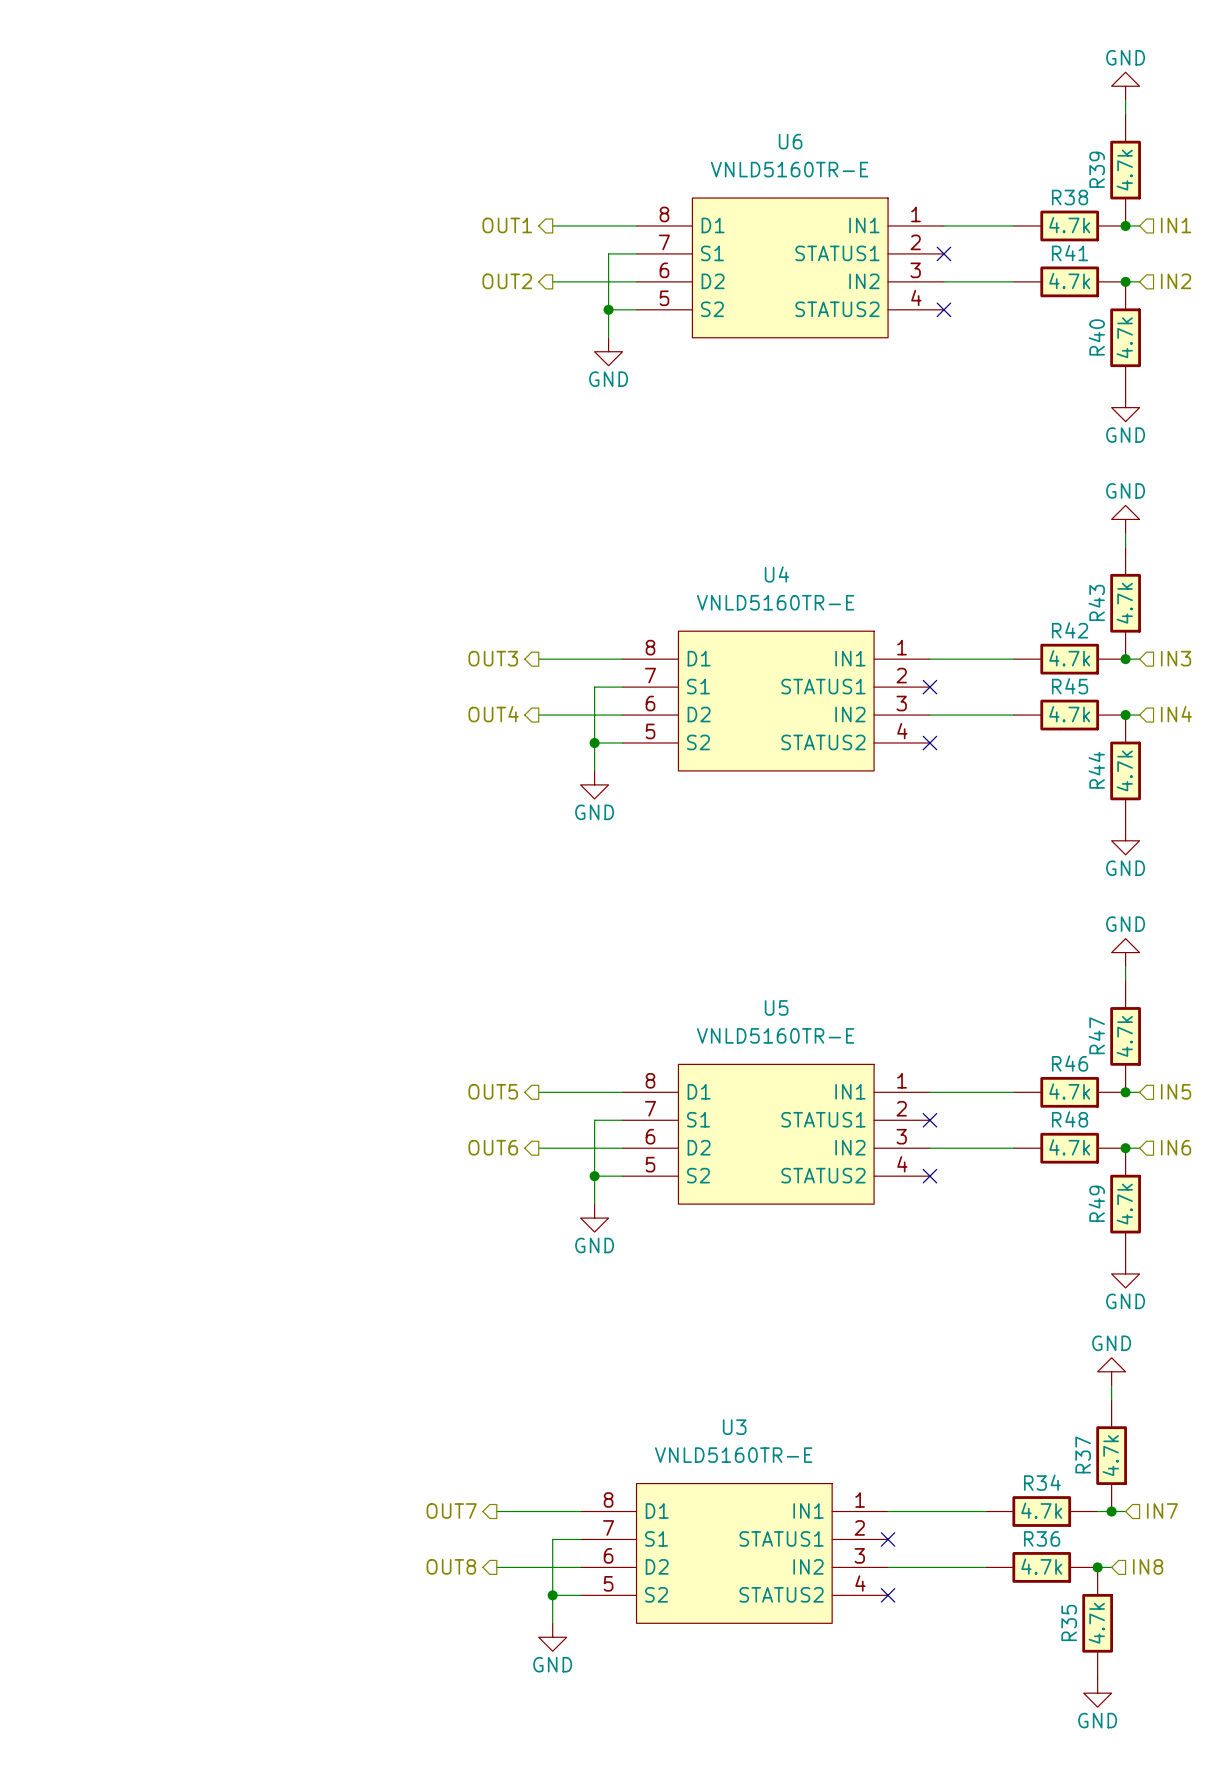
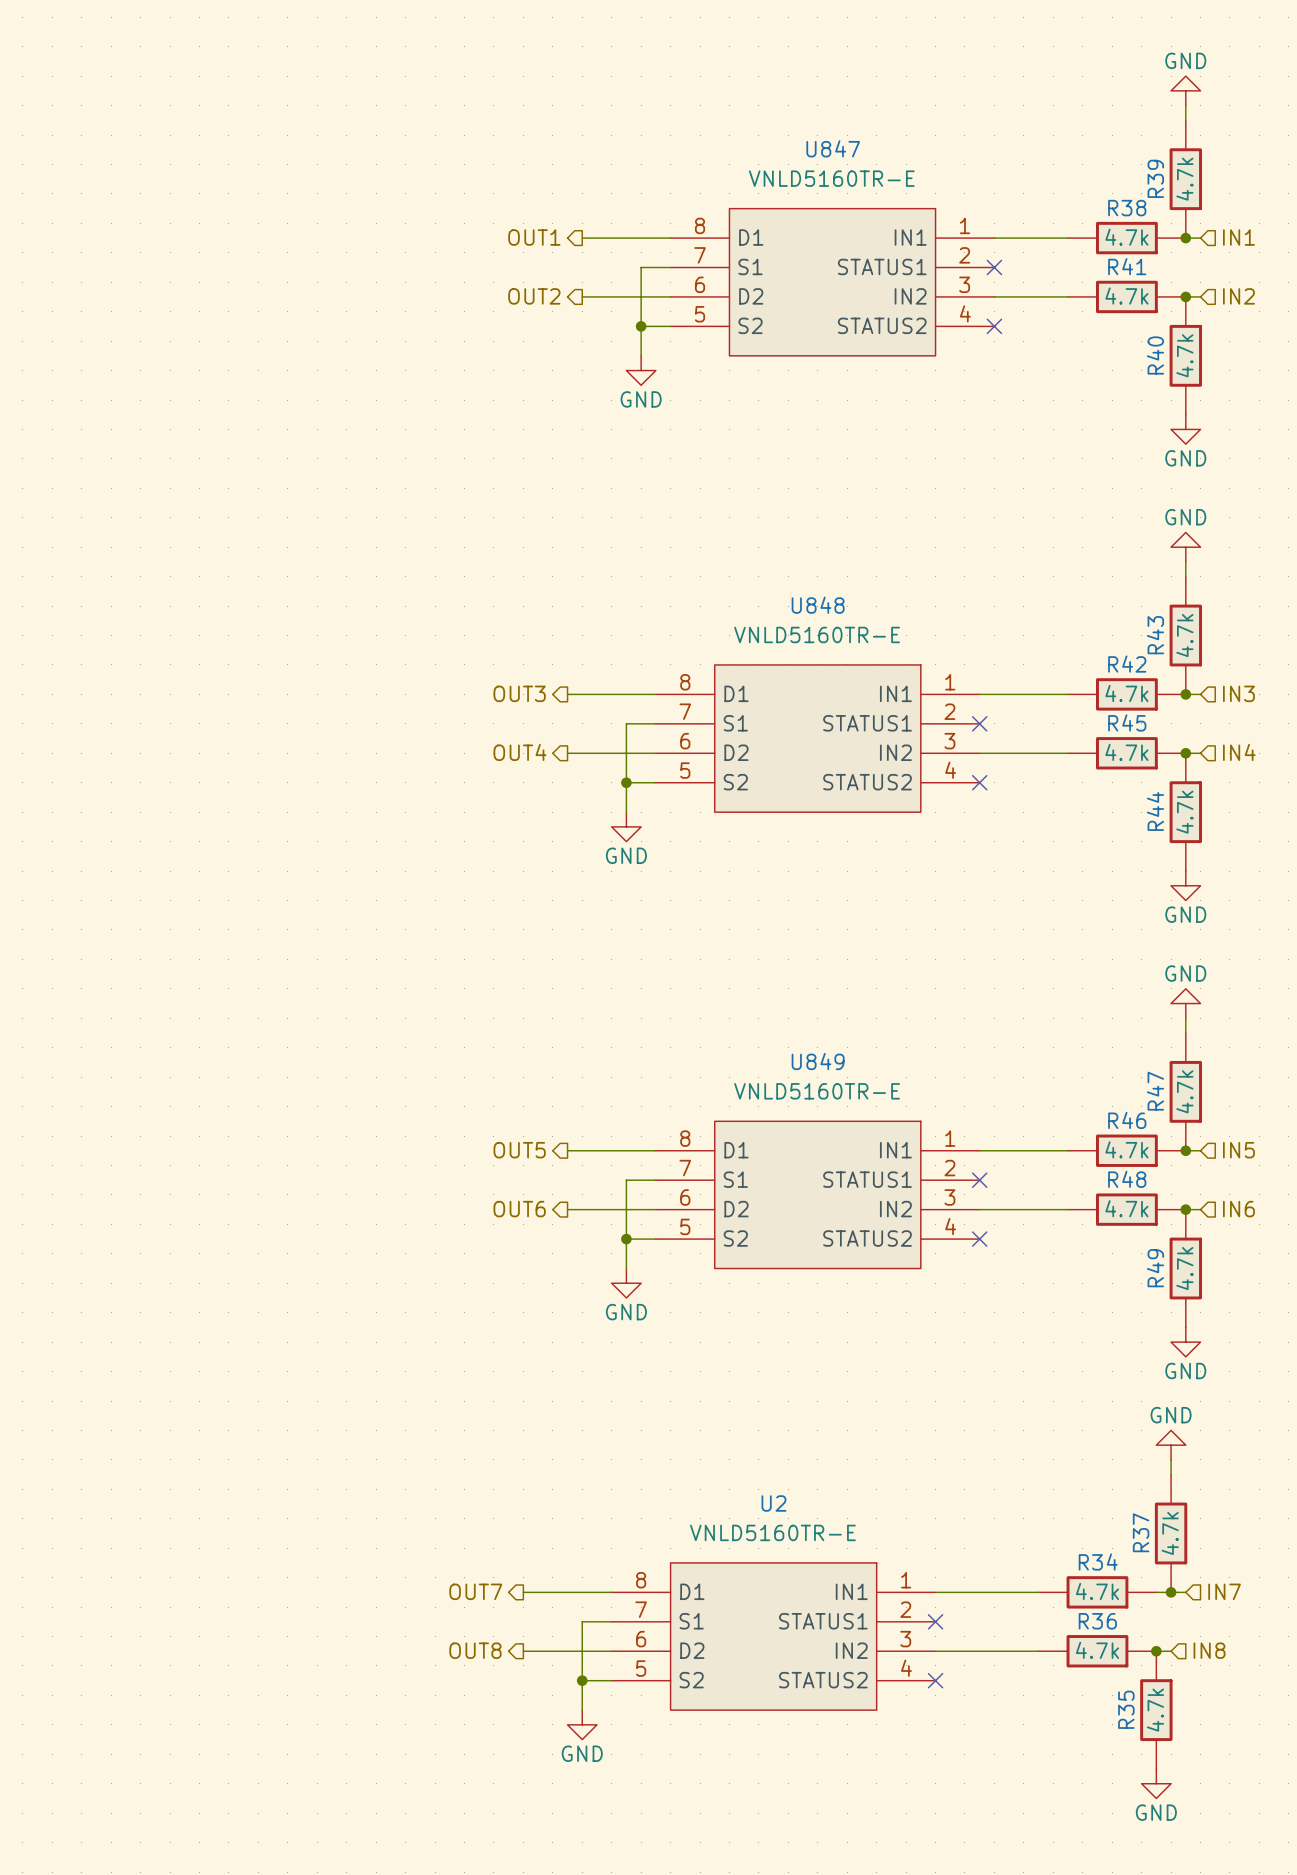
U6 name: U6 (790, 141) -> U847 (833, 148)
U4 name: U4 (776, 574) -> U848 (818, 605)
U5 name: U5 (776, 1007) -> U849 (818, 1061)
U3 name: U3 (734, 1427) -> U2 (773, 1503)

